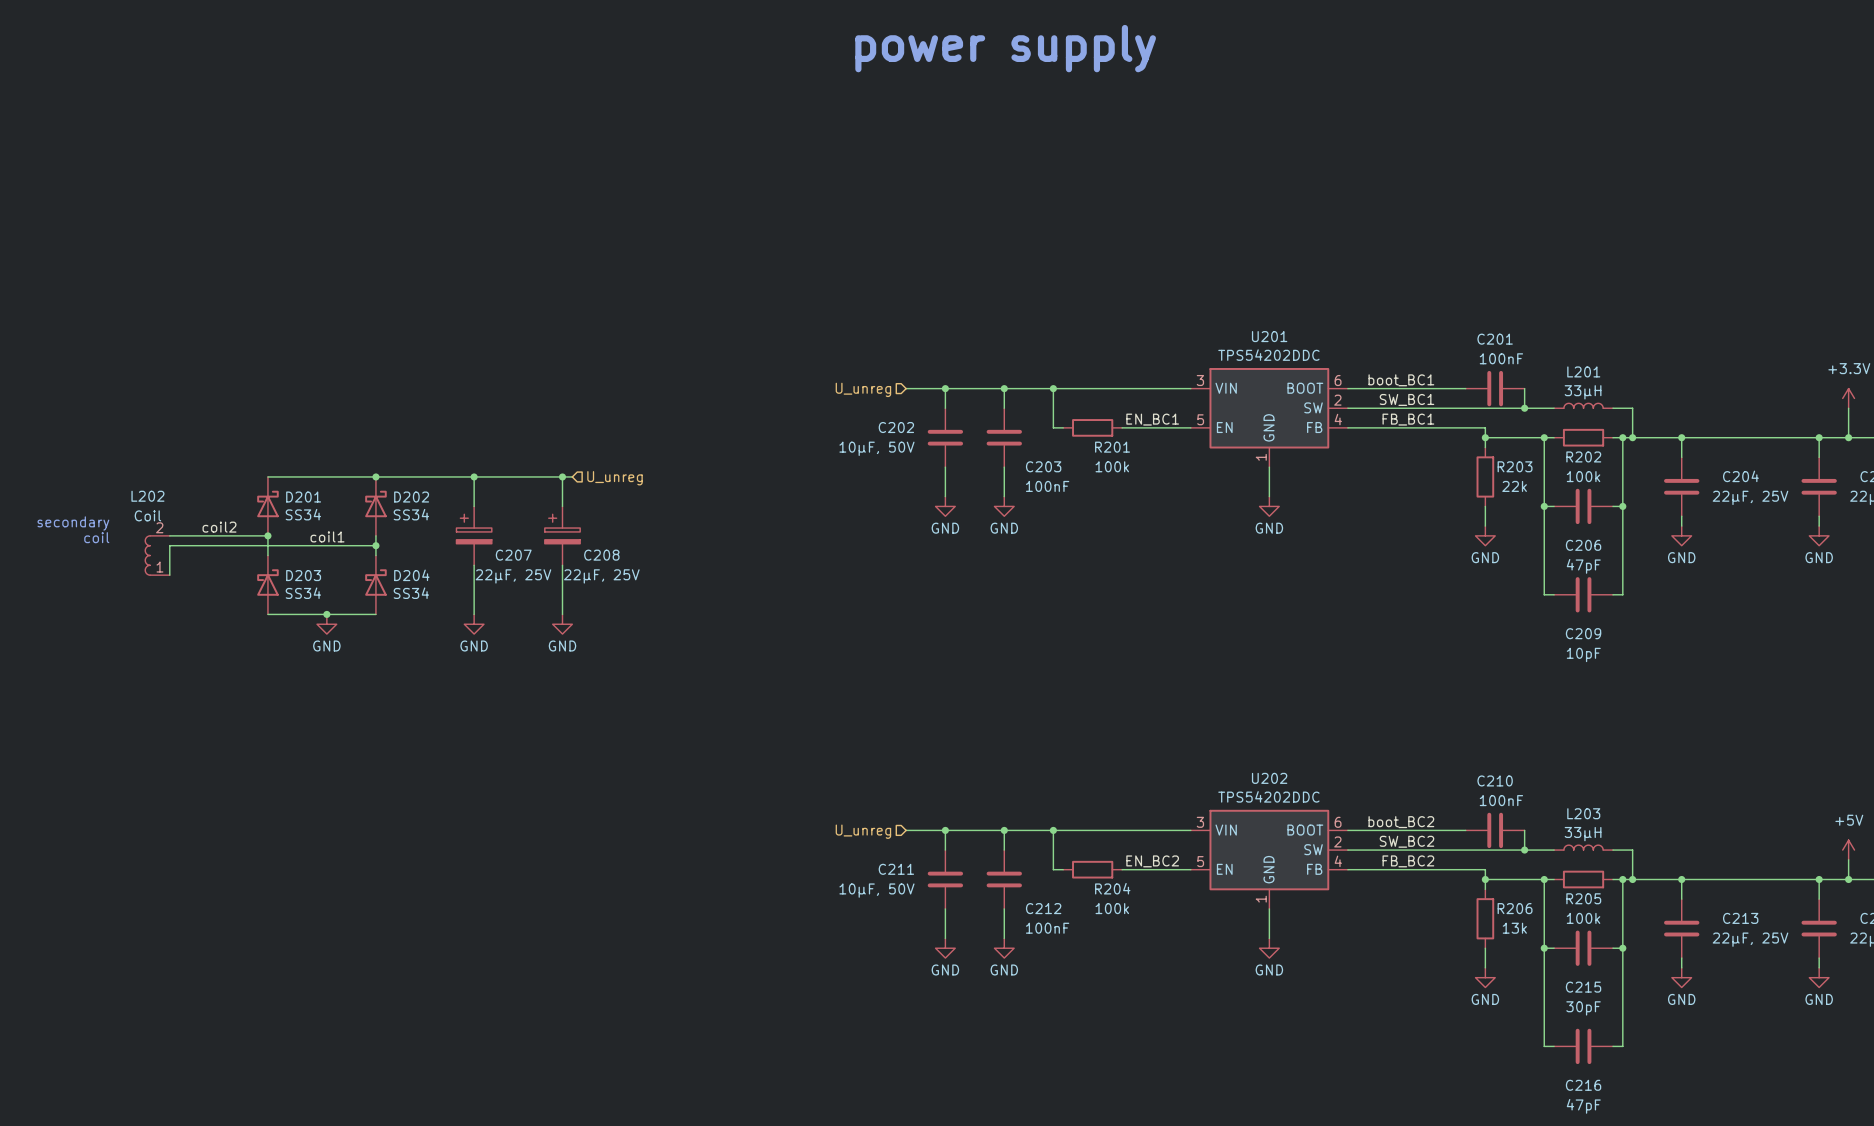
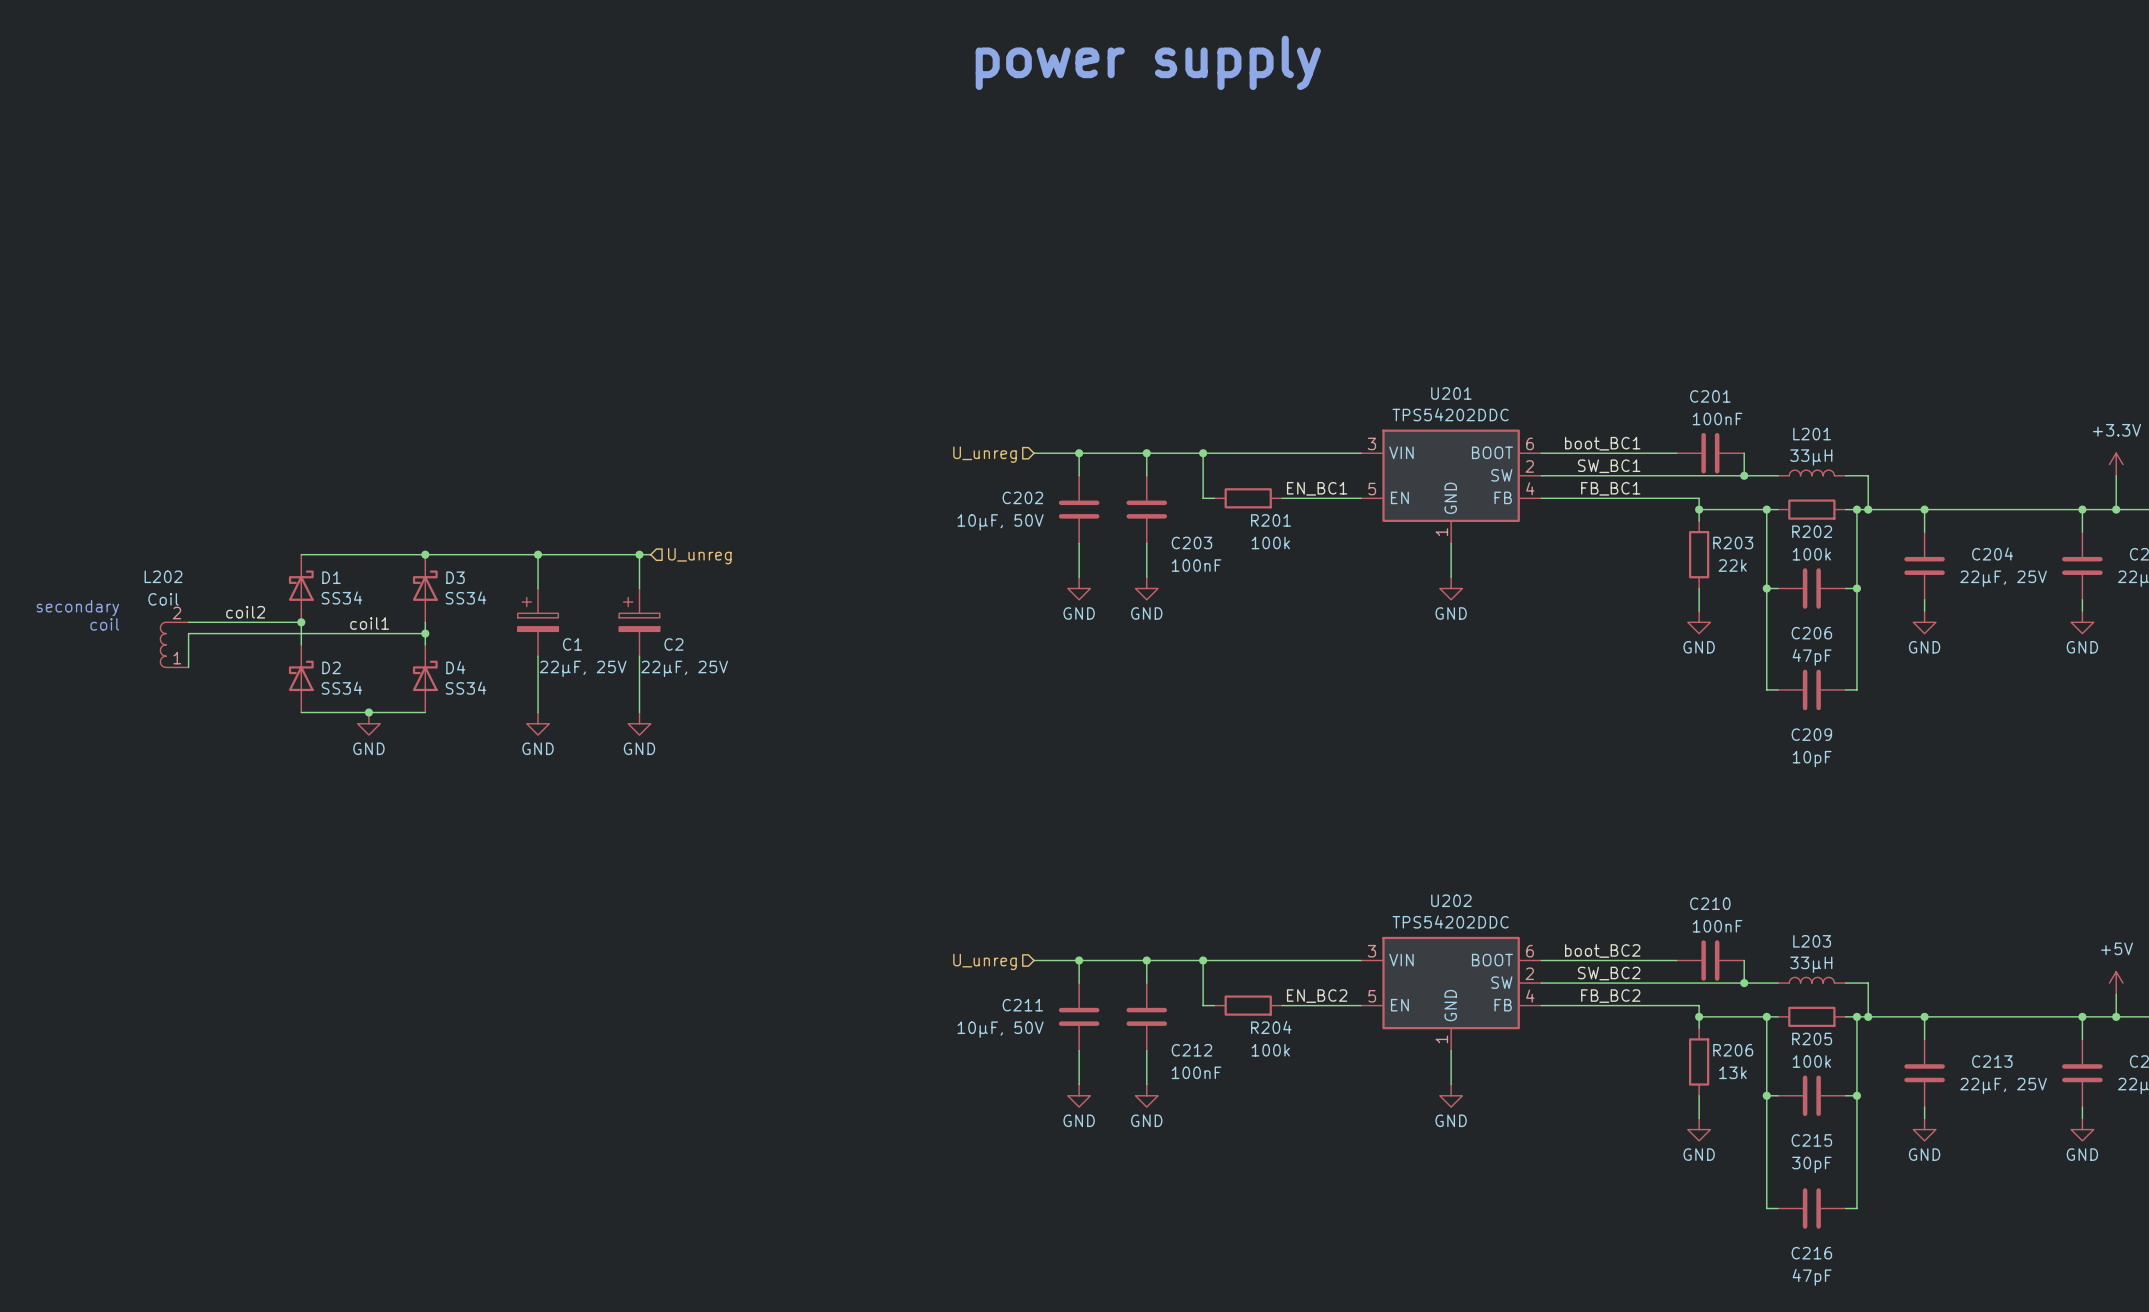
D201 name: D201 (303, 497) -> D1 (331, 577)
D202 name: D202 (411, 497) -> D3 (455, 577)
C207 name: C207 (513, 555) -> C1 (572, 644)
C208 name: C208 (601, 555) -> C2 (673, 644)
D203 name: D203 (303, 575) -> D2 (331, 667)
D204 name: D204 (411, 575) -> D4 (455, 667)

